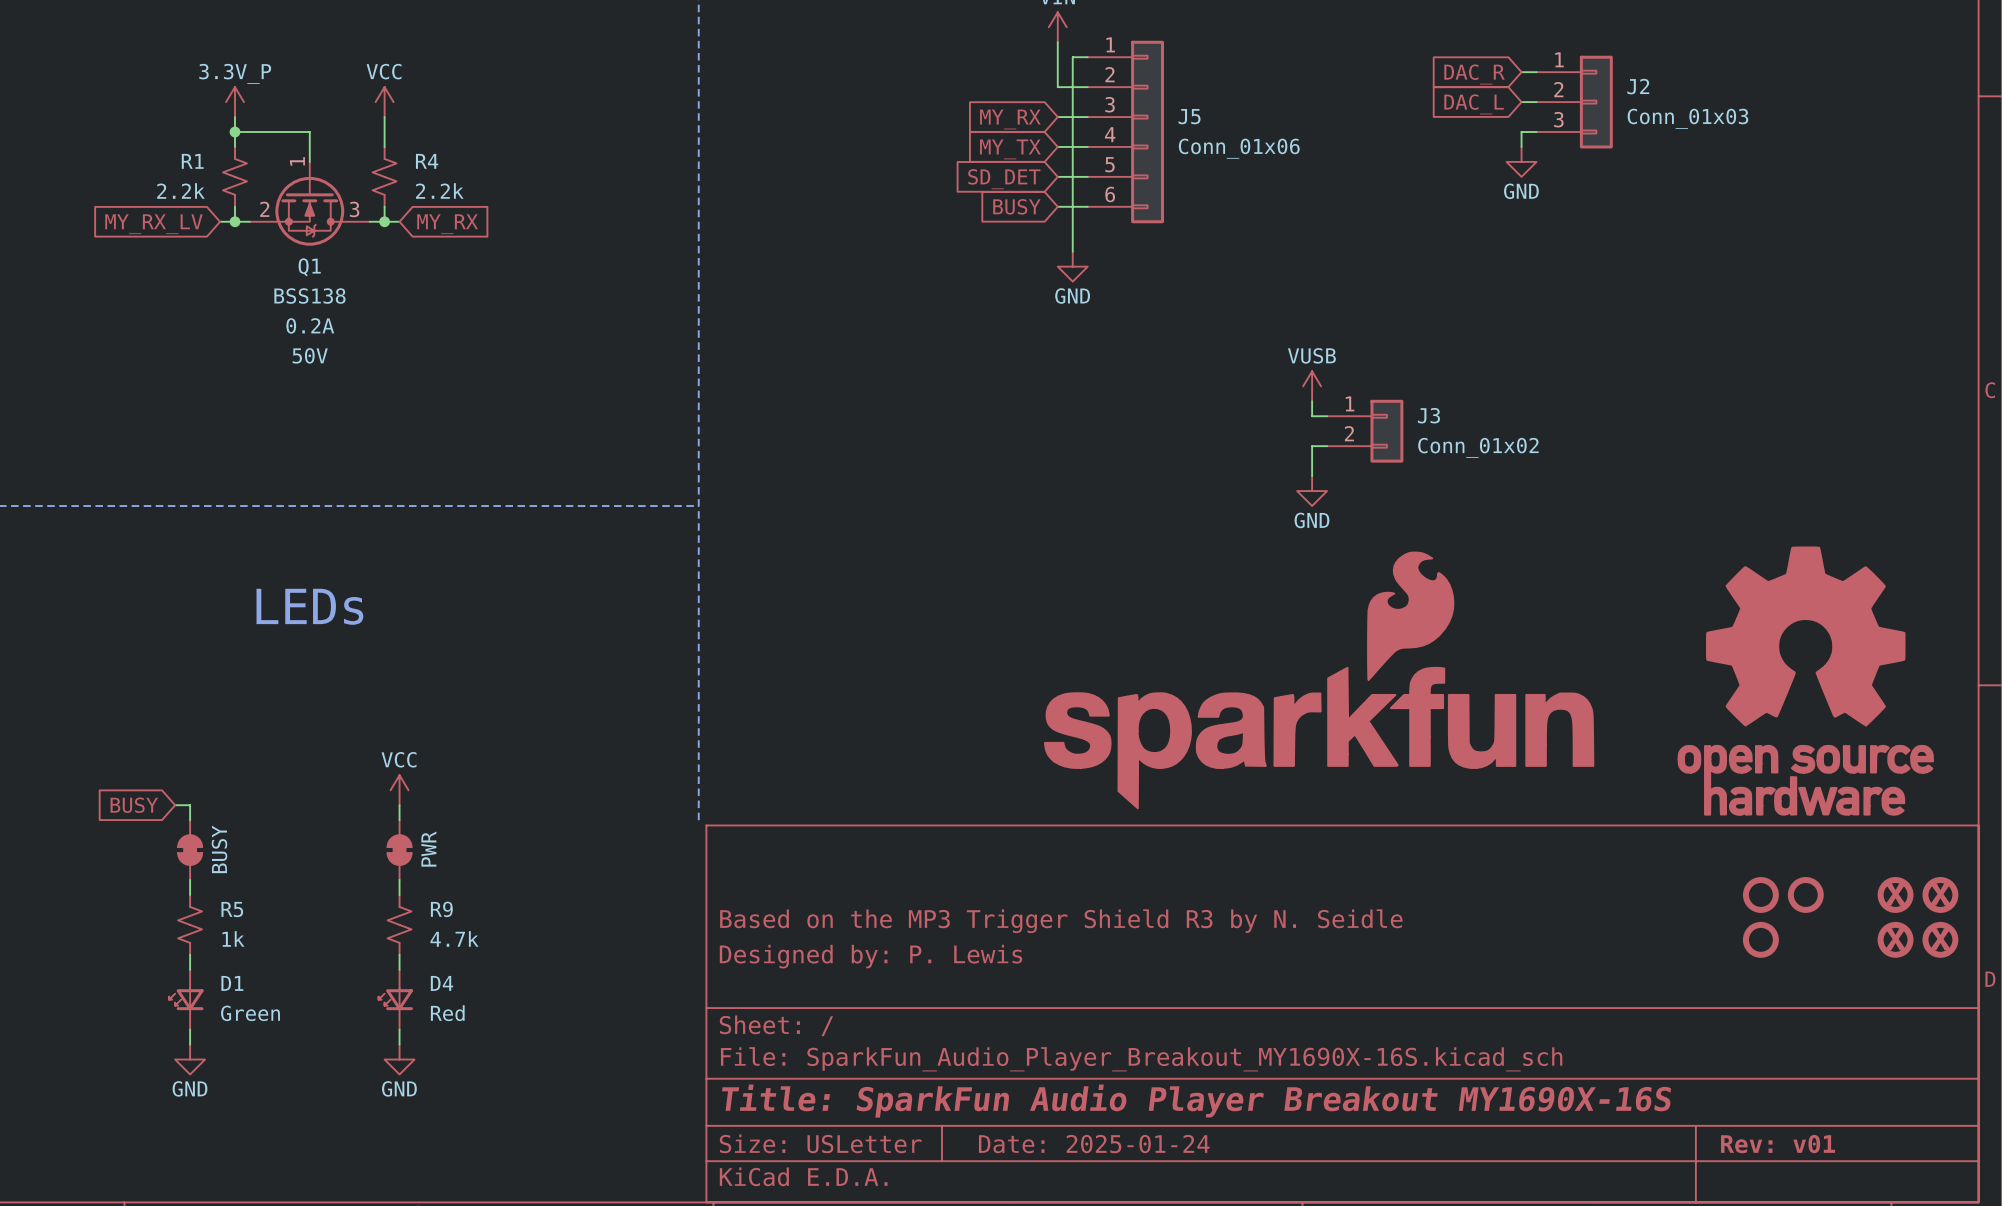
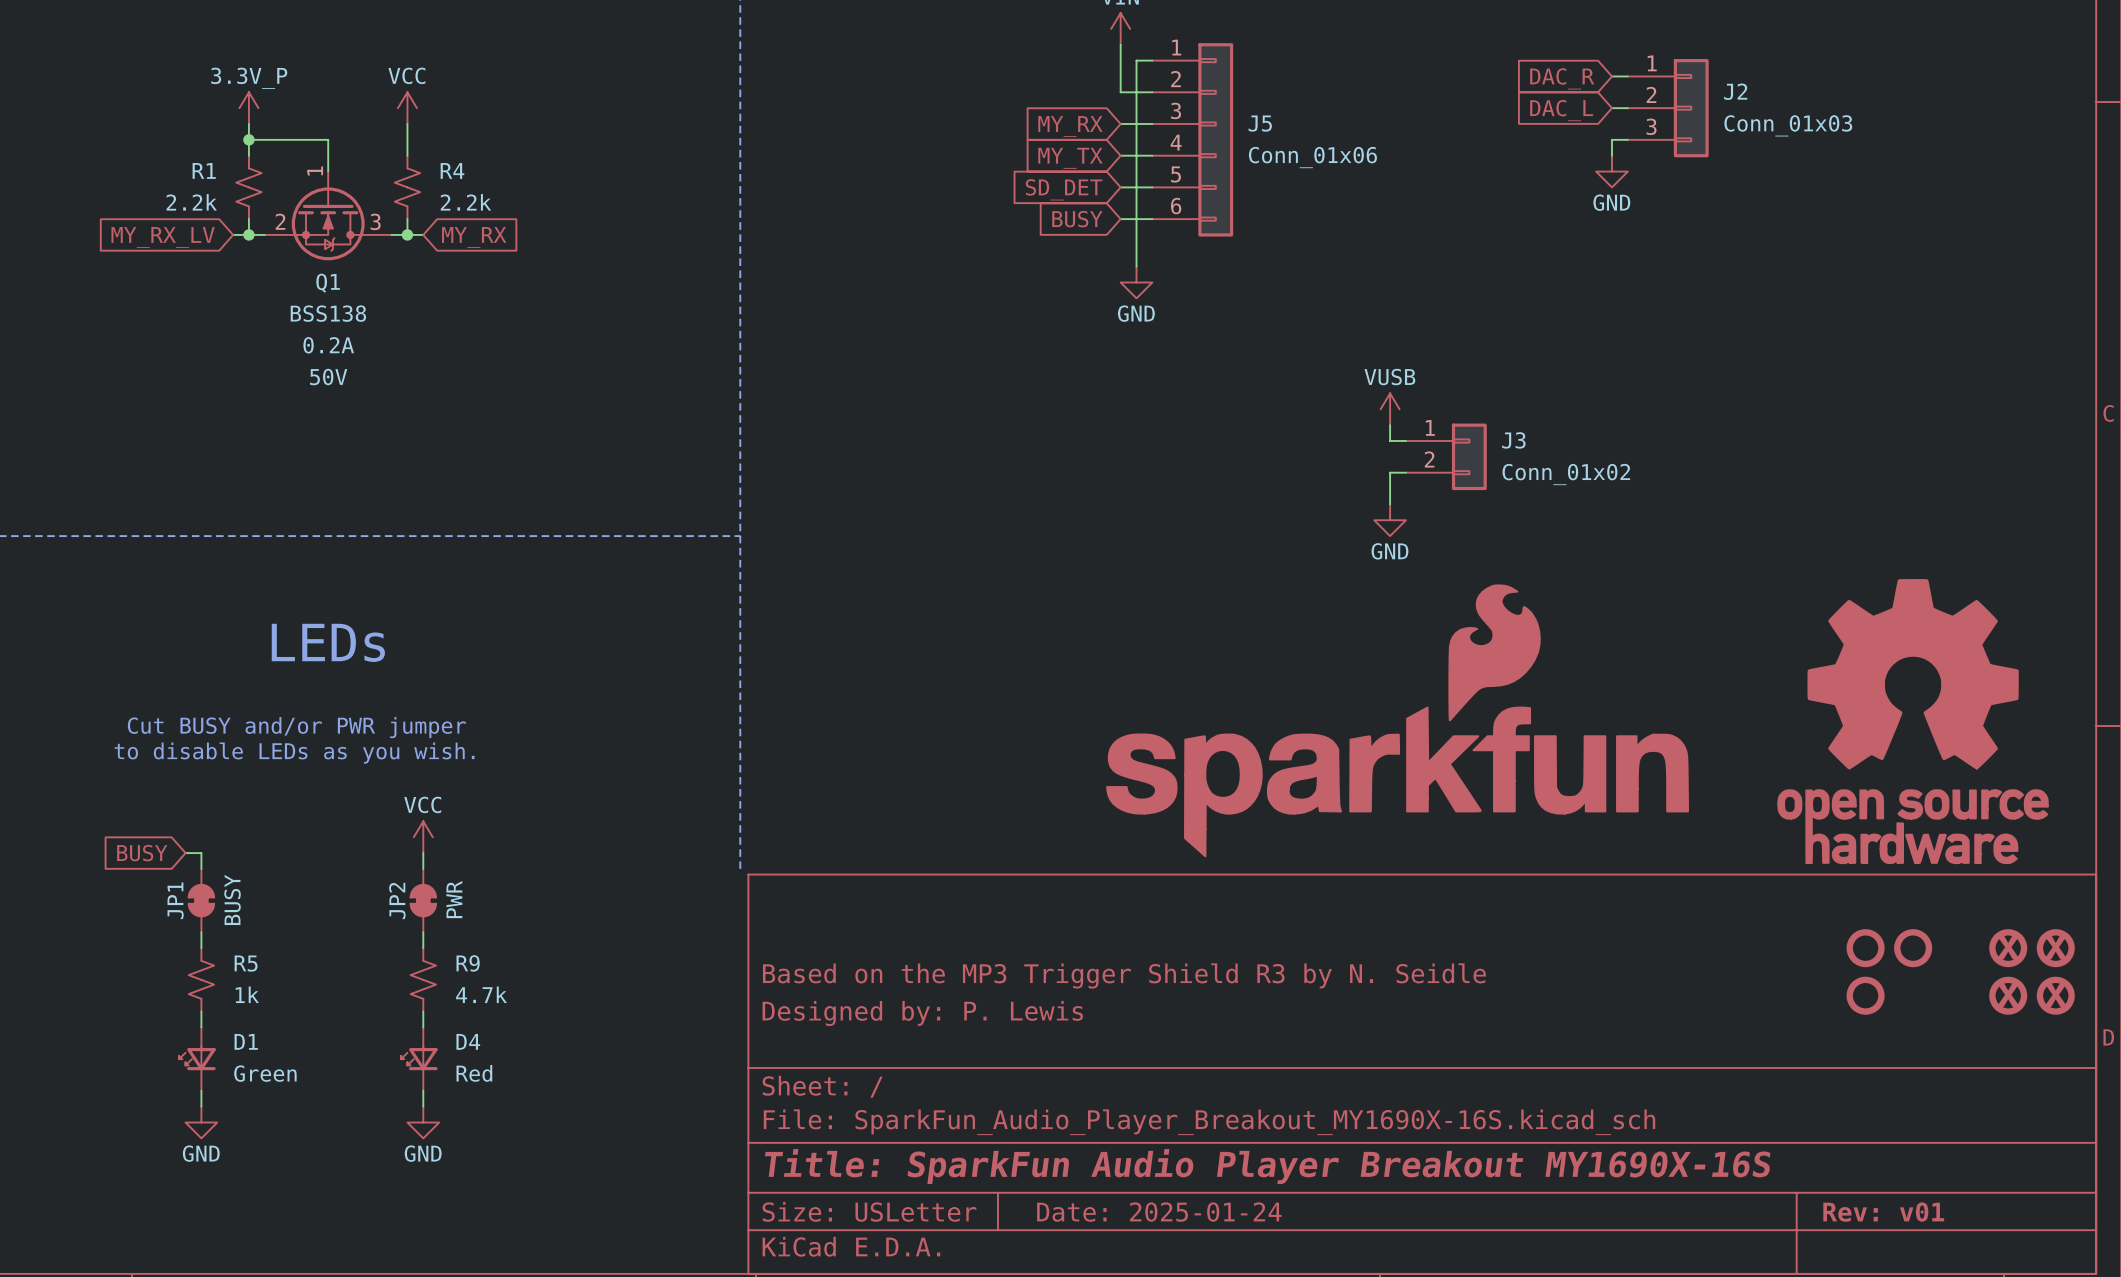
text: none -> Cut BUSY and/or PWR jumper (296, 727)
text: none -> to disable LEDs as you wish. (294, 753)
JP1 name: none -> JP1 (175, 900)
JP2 name: none -> JP2 (397, 900)

